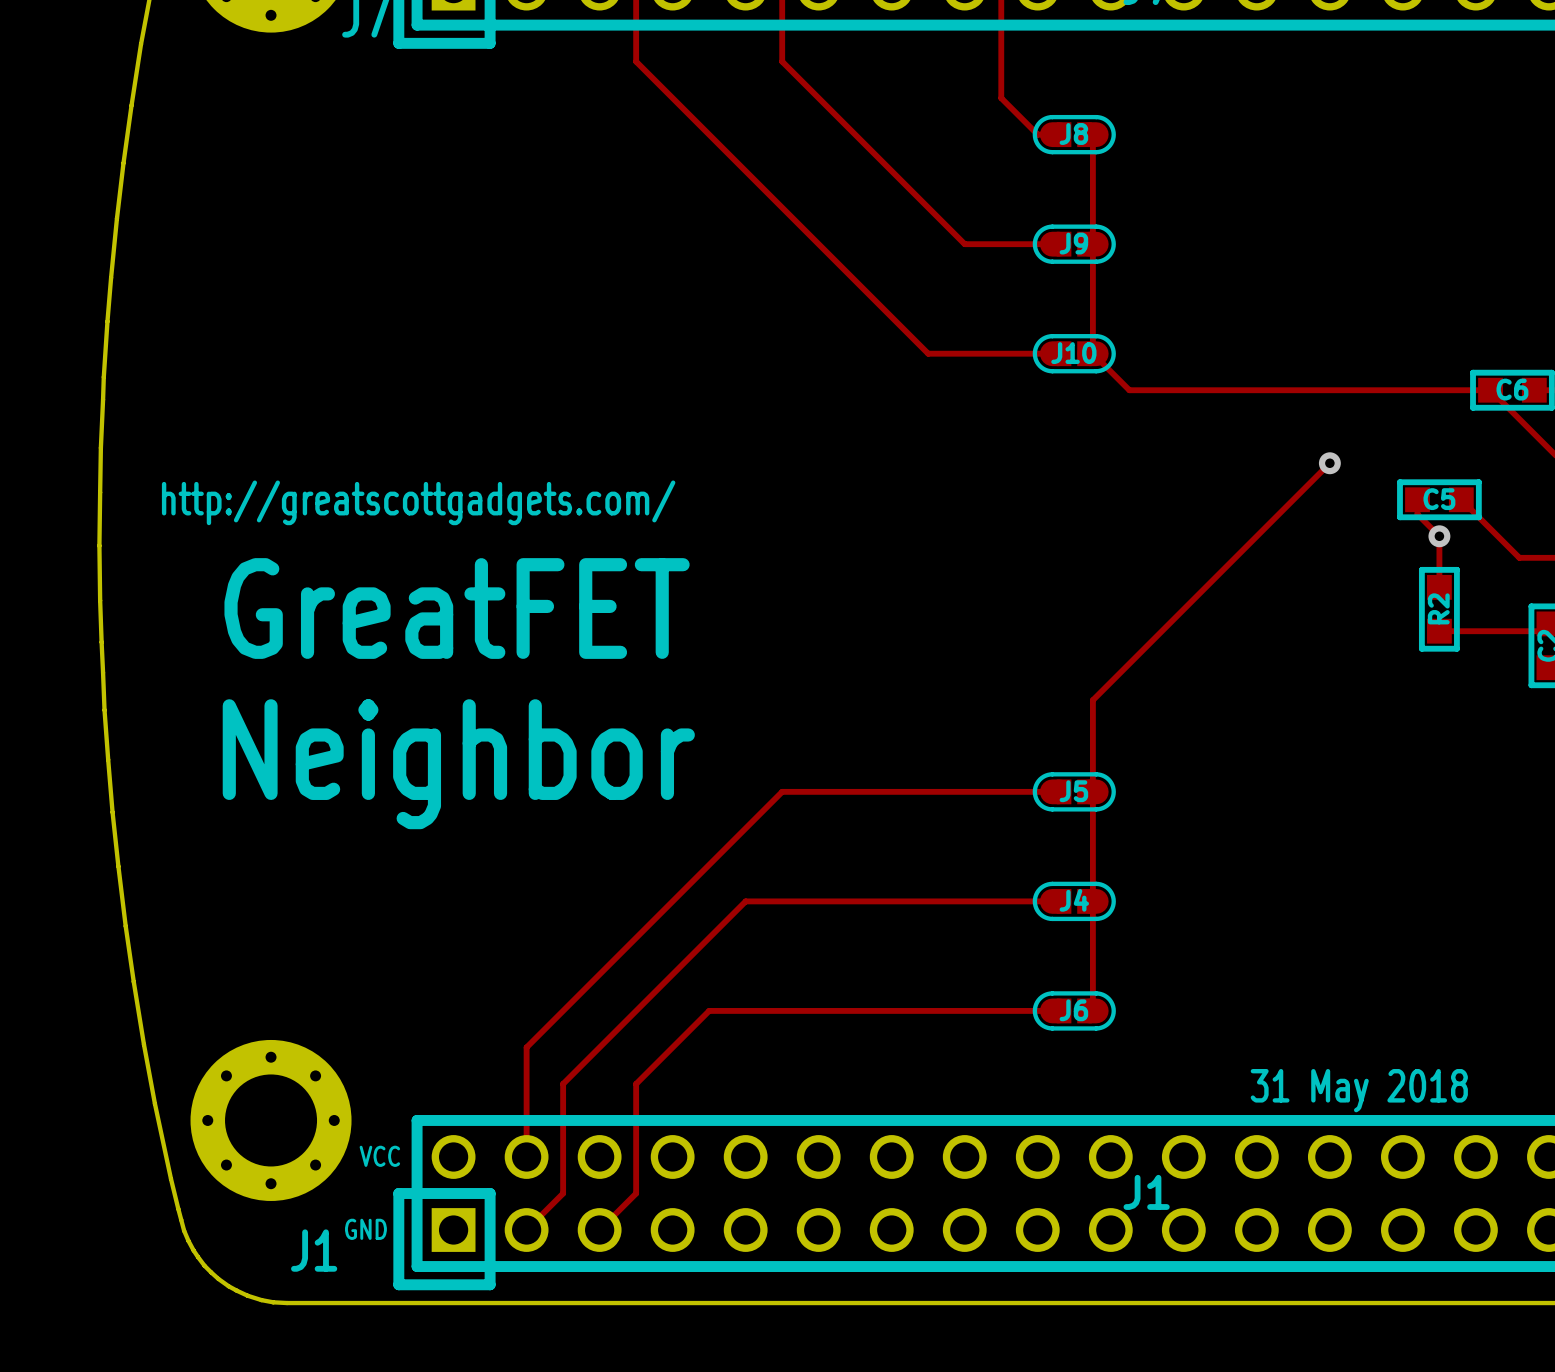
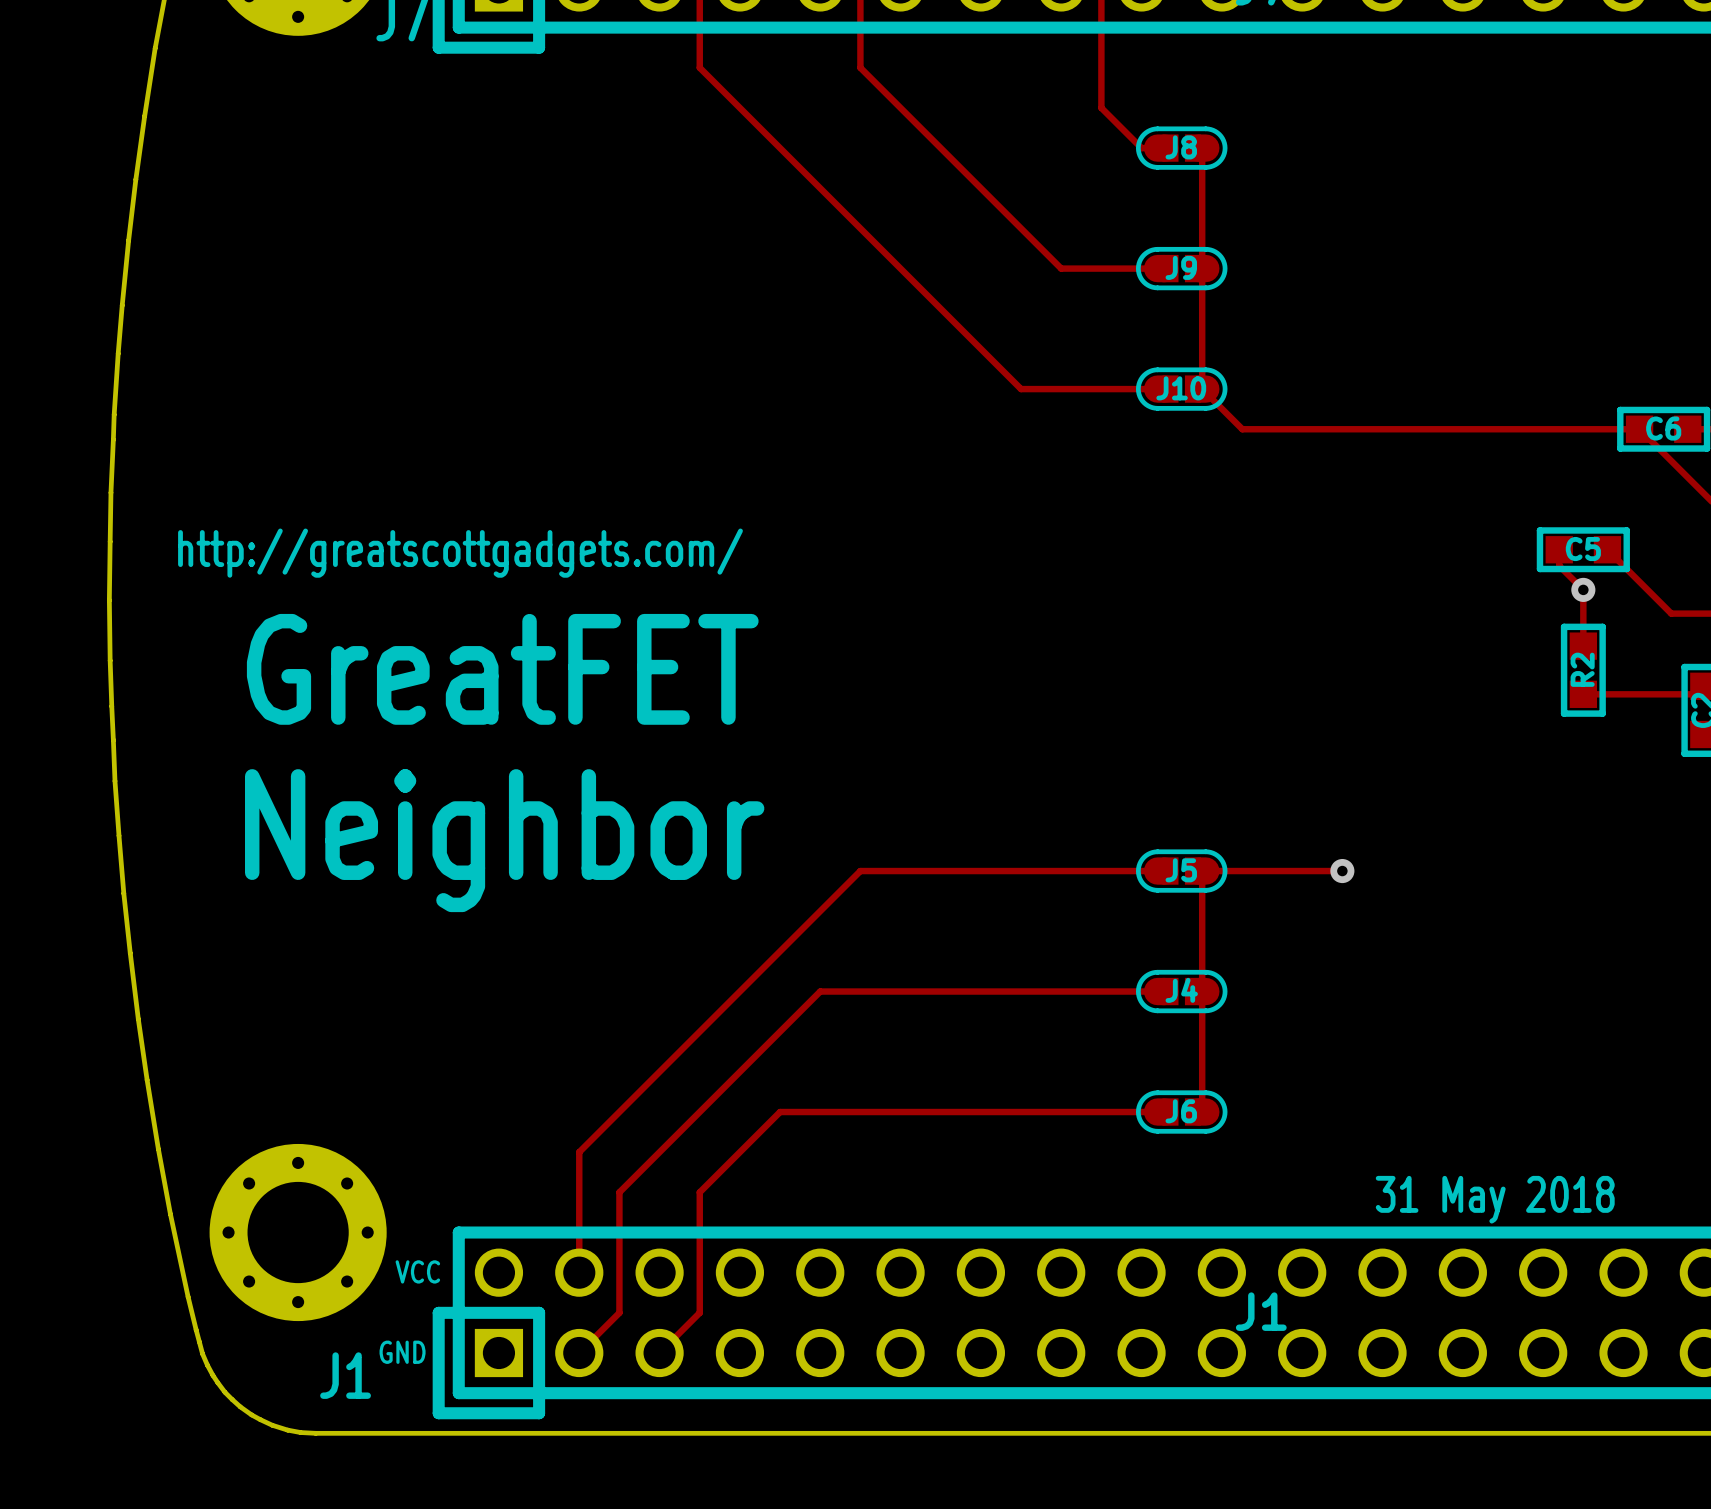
track: (1329, 463) (1092, 700) (1092, 791) -> (1342, 871) (1202, 871)
via: (1329, 463) -> none
via: none -> (1342, 871)

